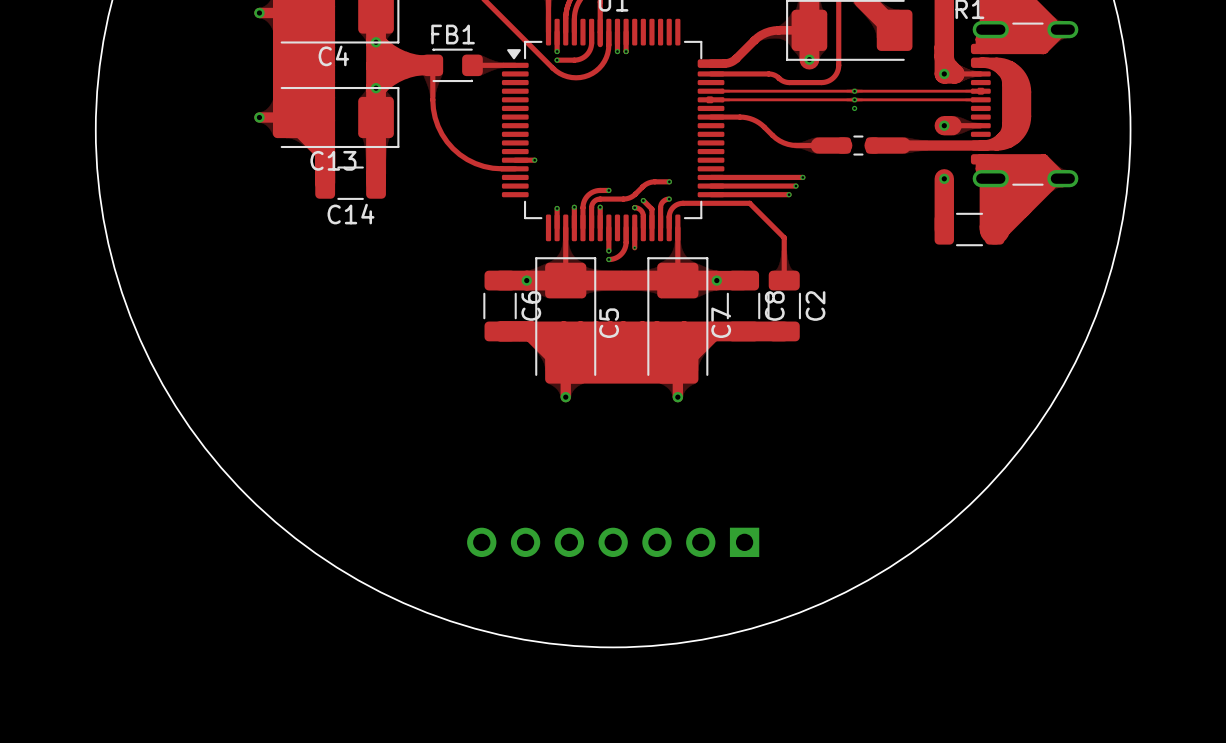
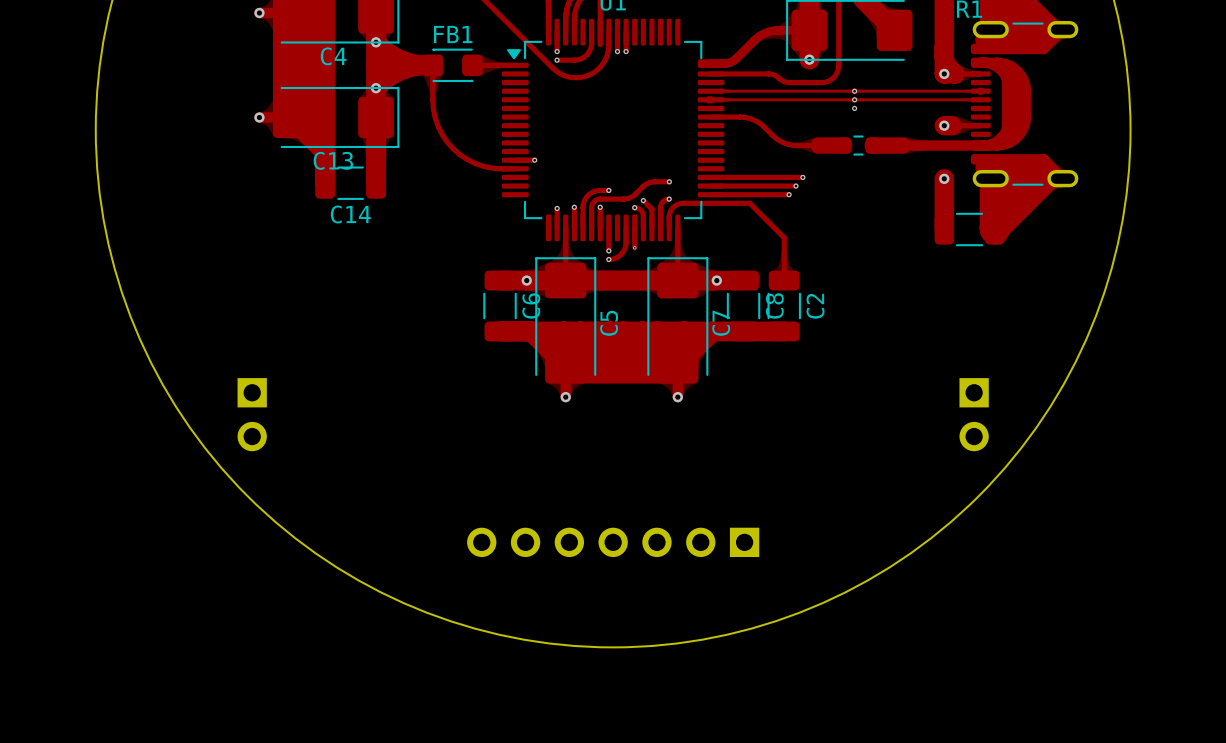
part: none -> (252, 414)
part: none -> (974, 414)

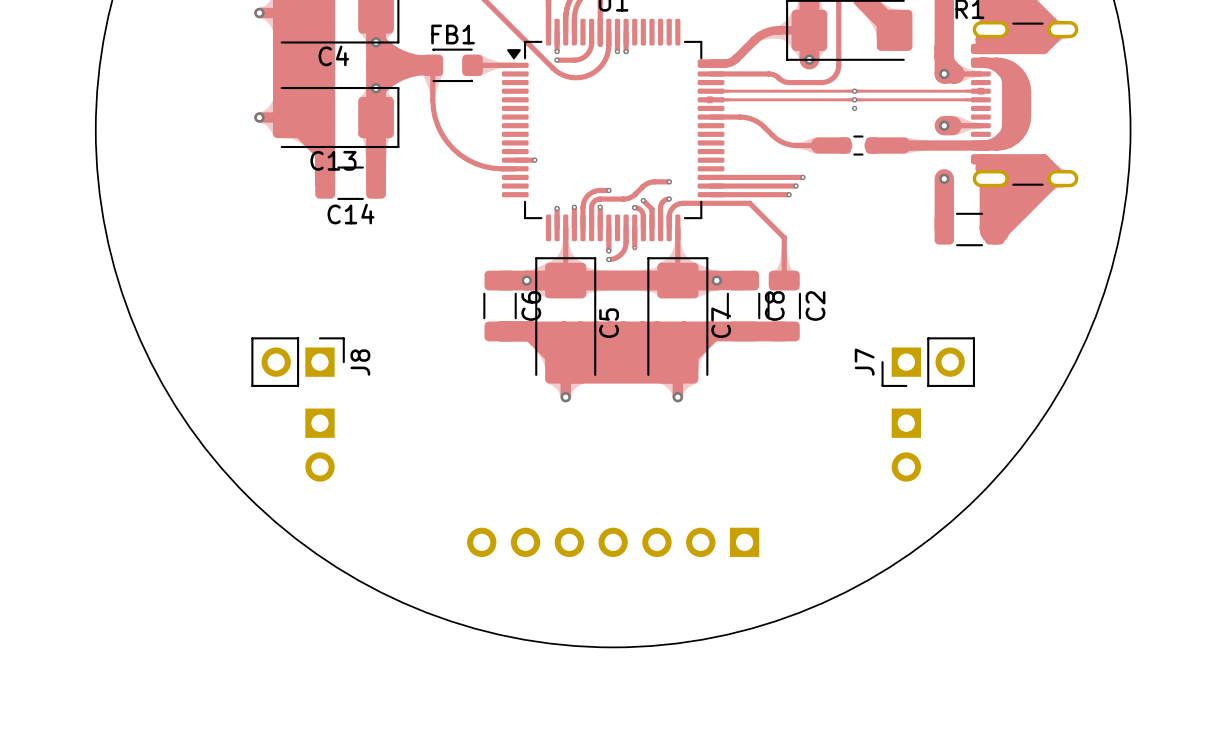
J8: none -> (298, 362)
J7: none -> (928, 362)
part position: (252, 414) -> (319, 445)
part position: (974, 414) -> (906, 445)

